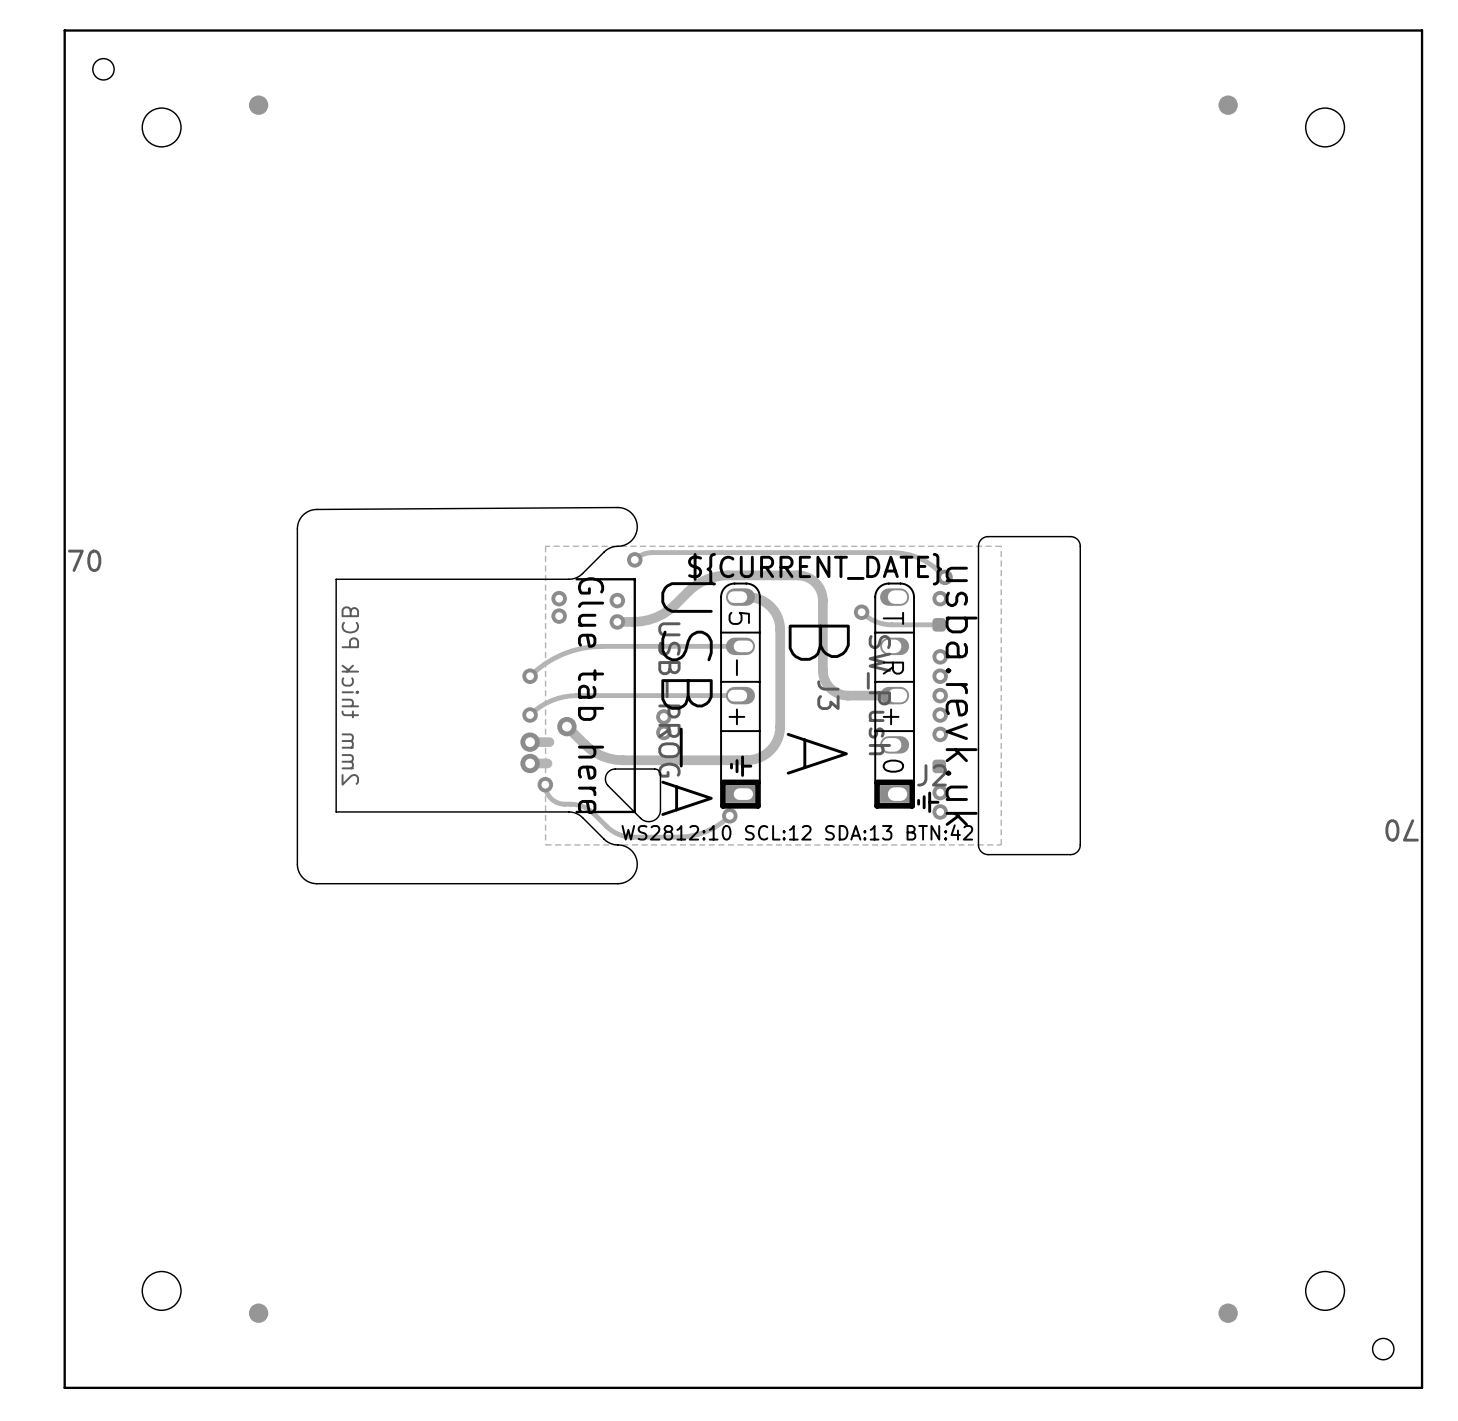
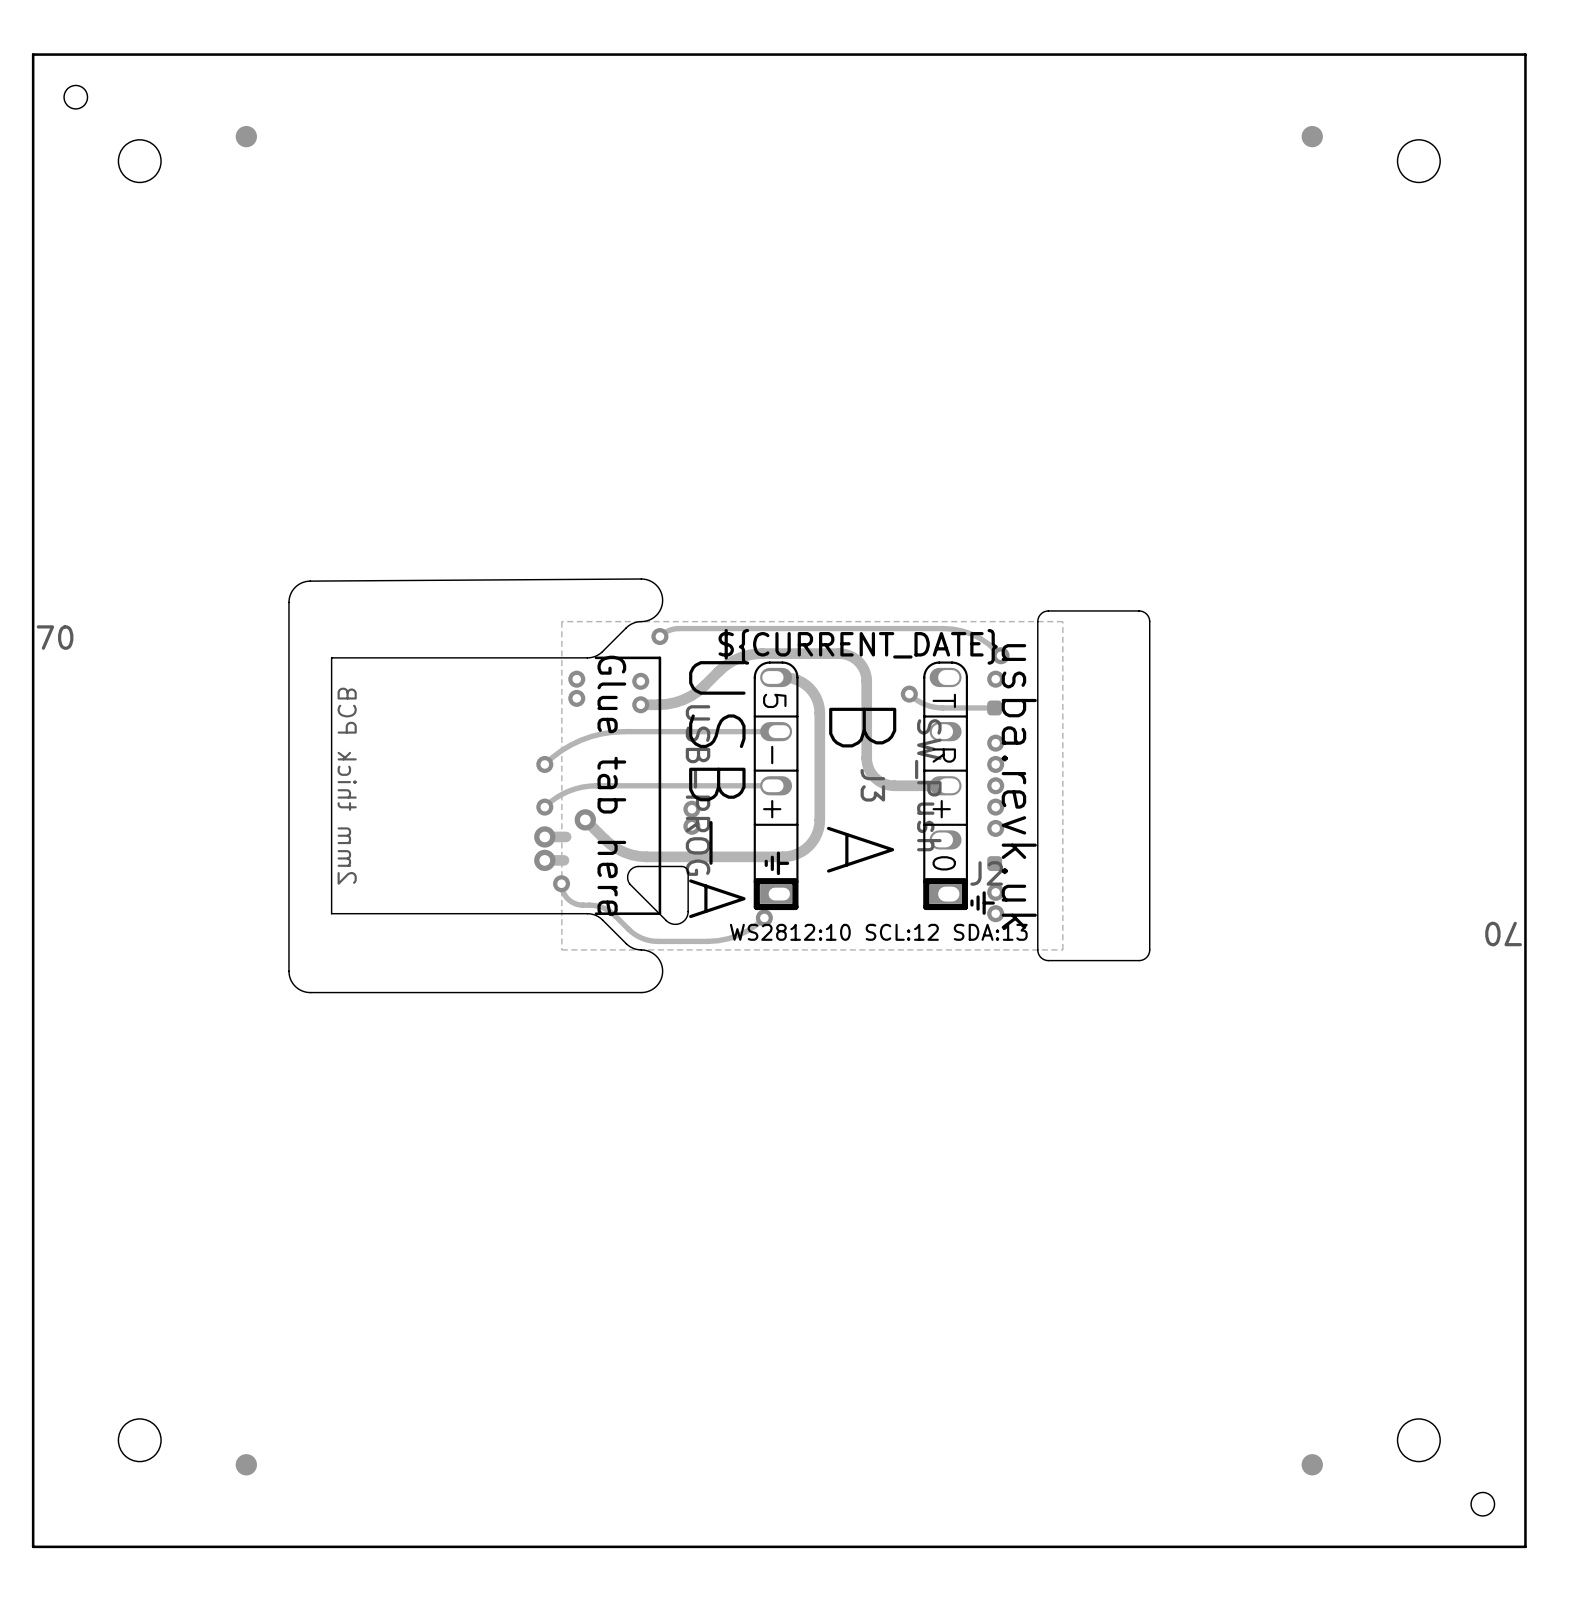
text: WS2812:10 SCL:12 SDA:13 BTN:42 (797, 832) -> WS2812:10 SCL:12 SDA:13 (878, 932)

